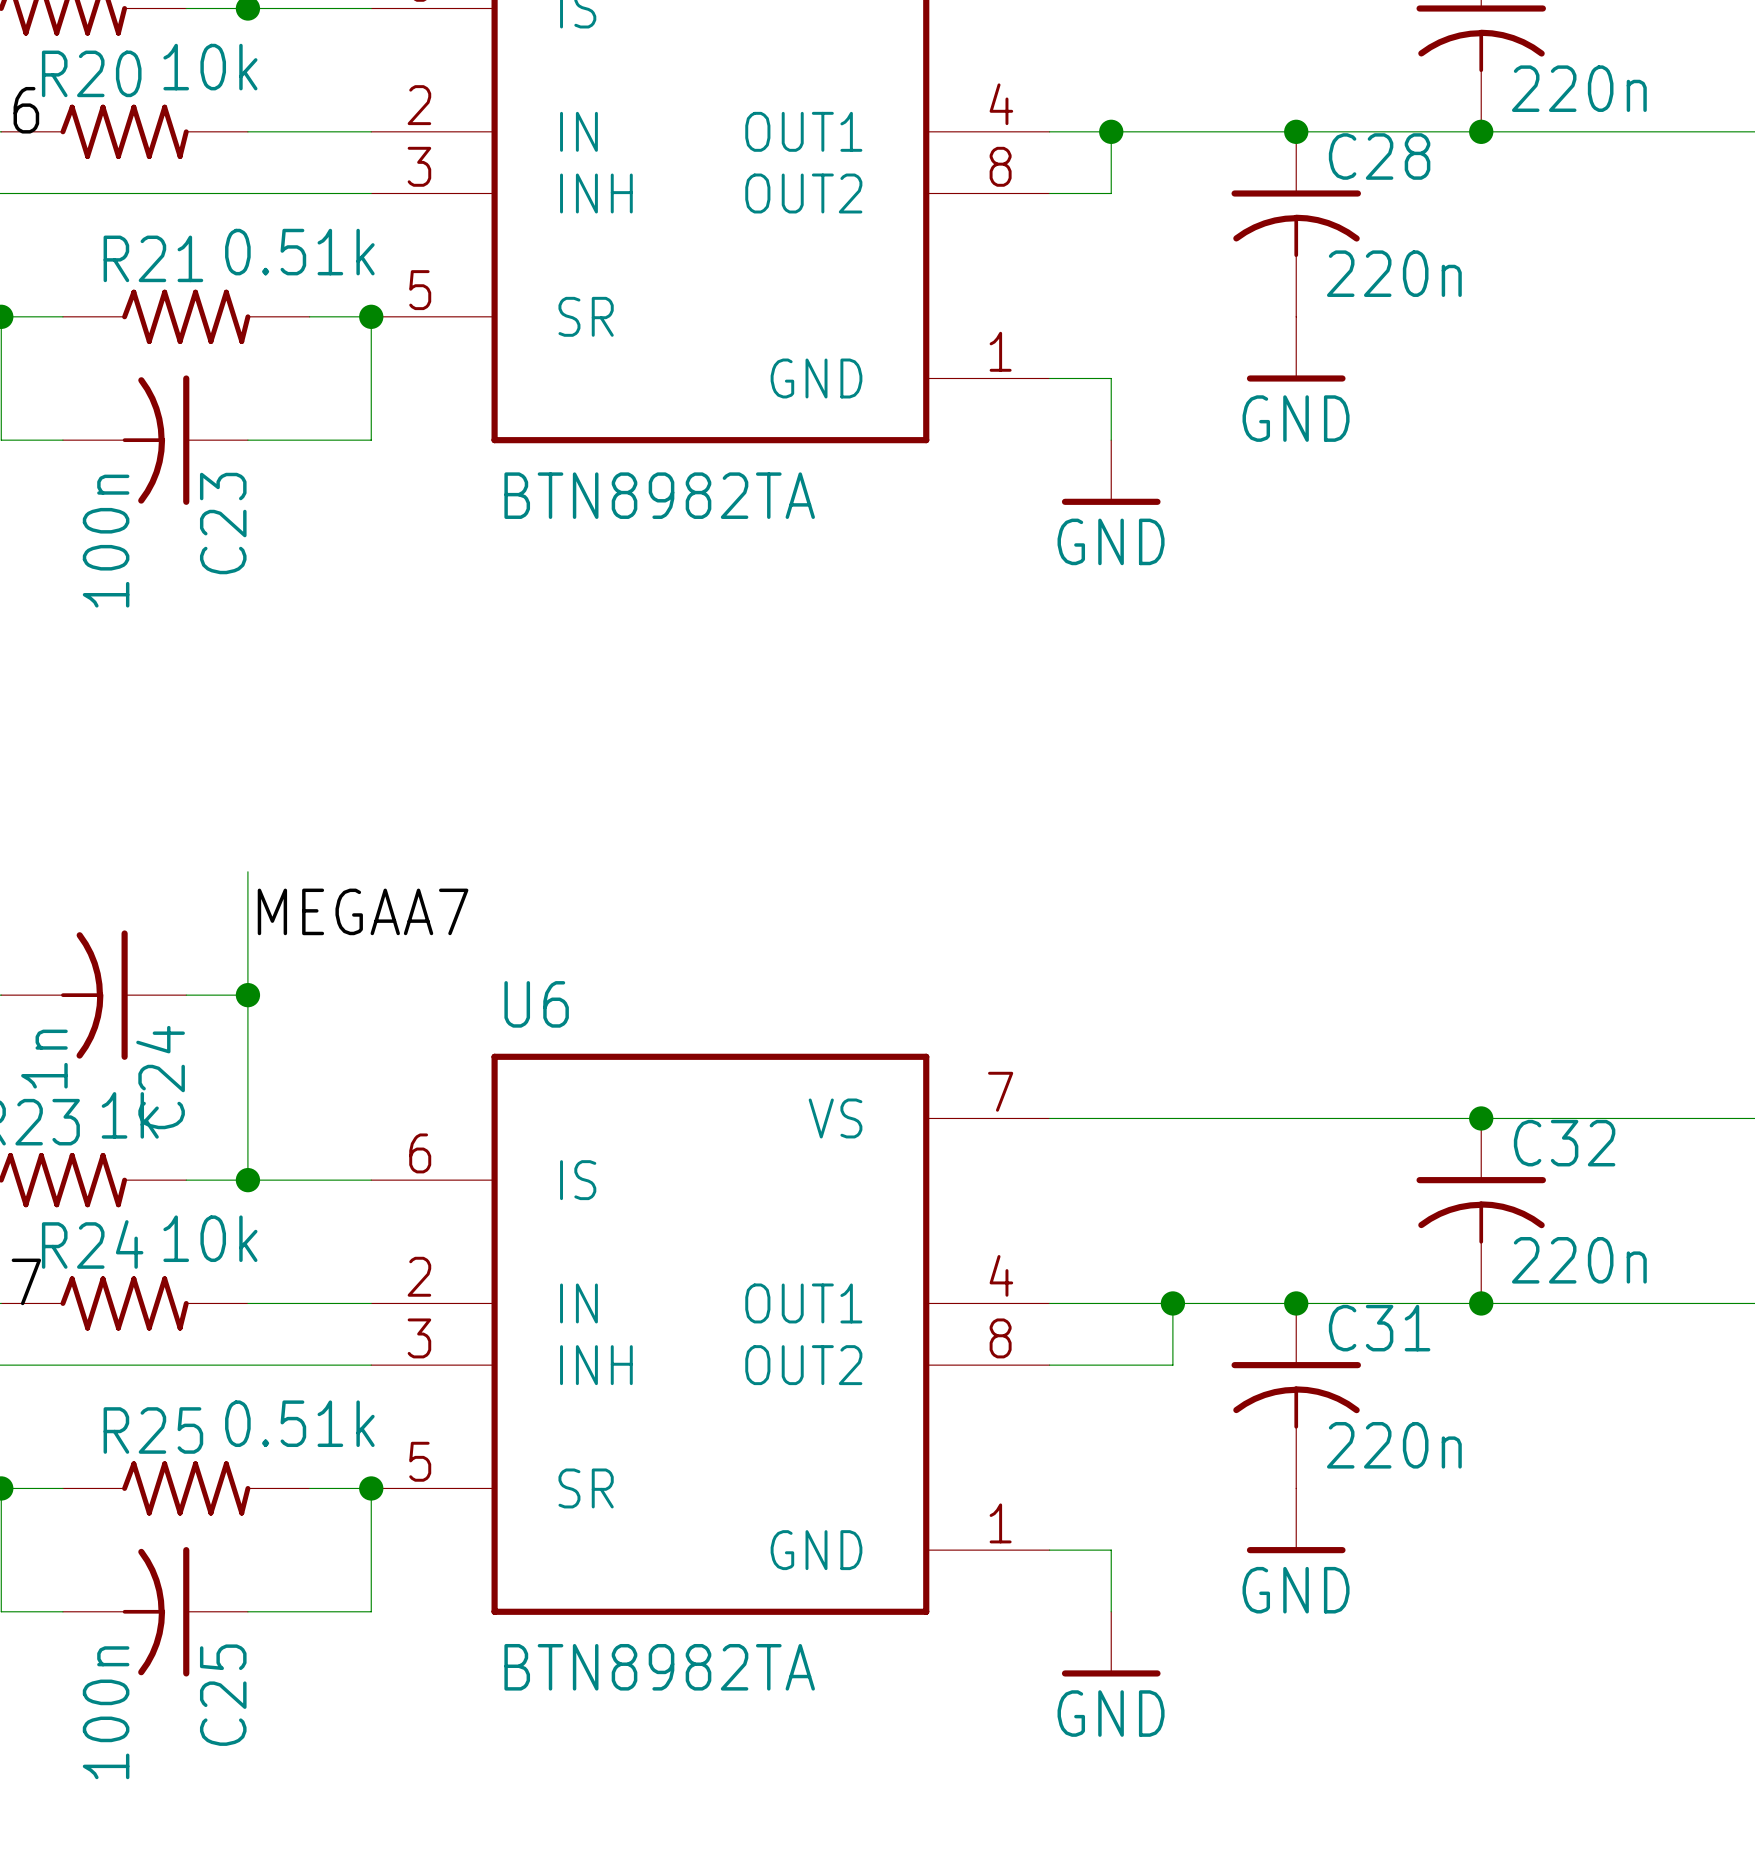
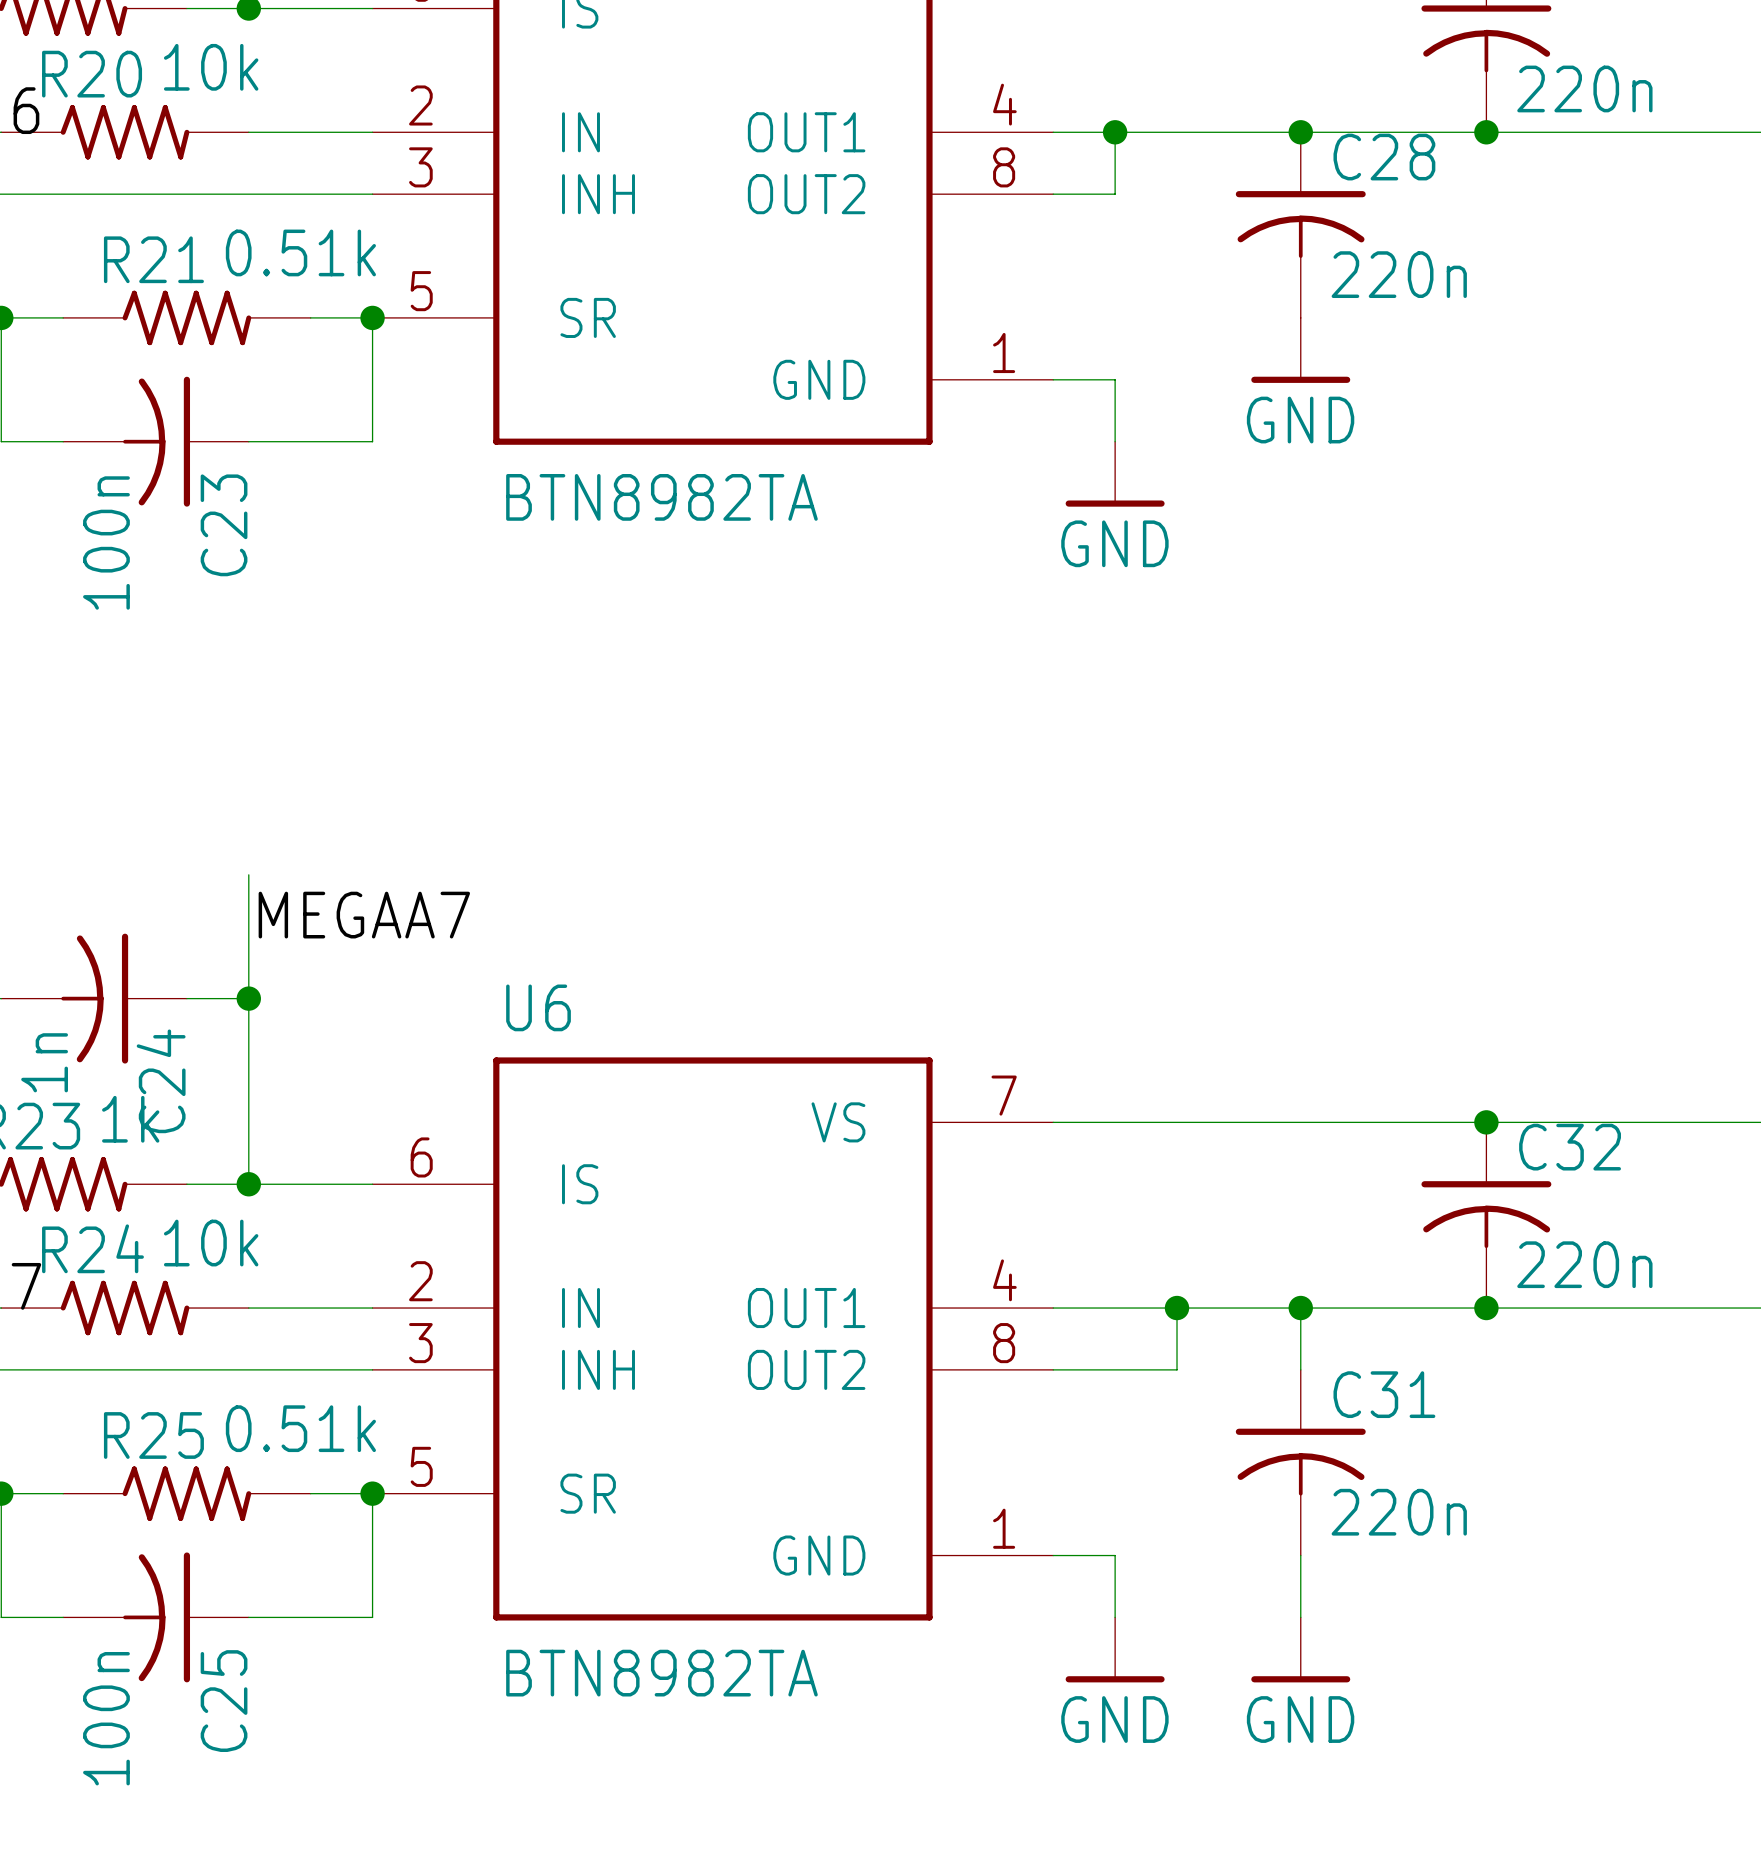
C31 position: (1296, 1395) -> (1300, 1462)
power symbol position: GND (1296, 1520) -> GND (1300, 1649)
wire: none -> (1300, 1555) (1300, 1617)

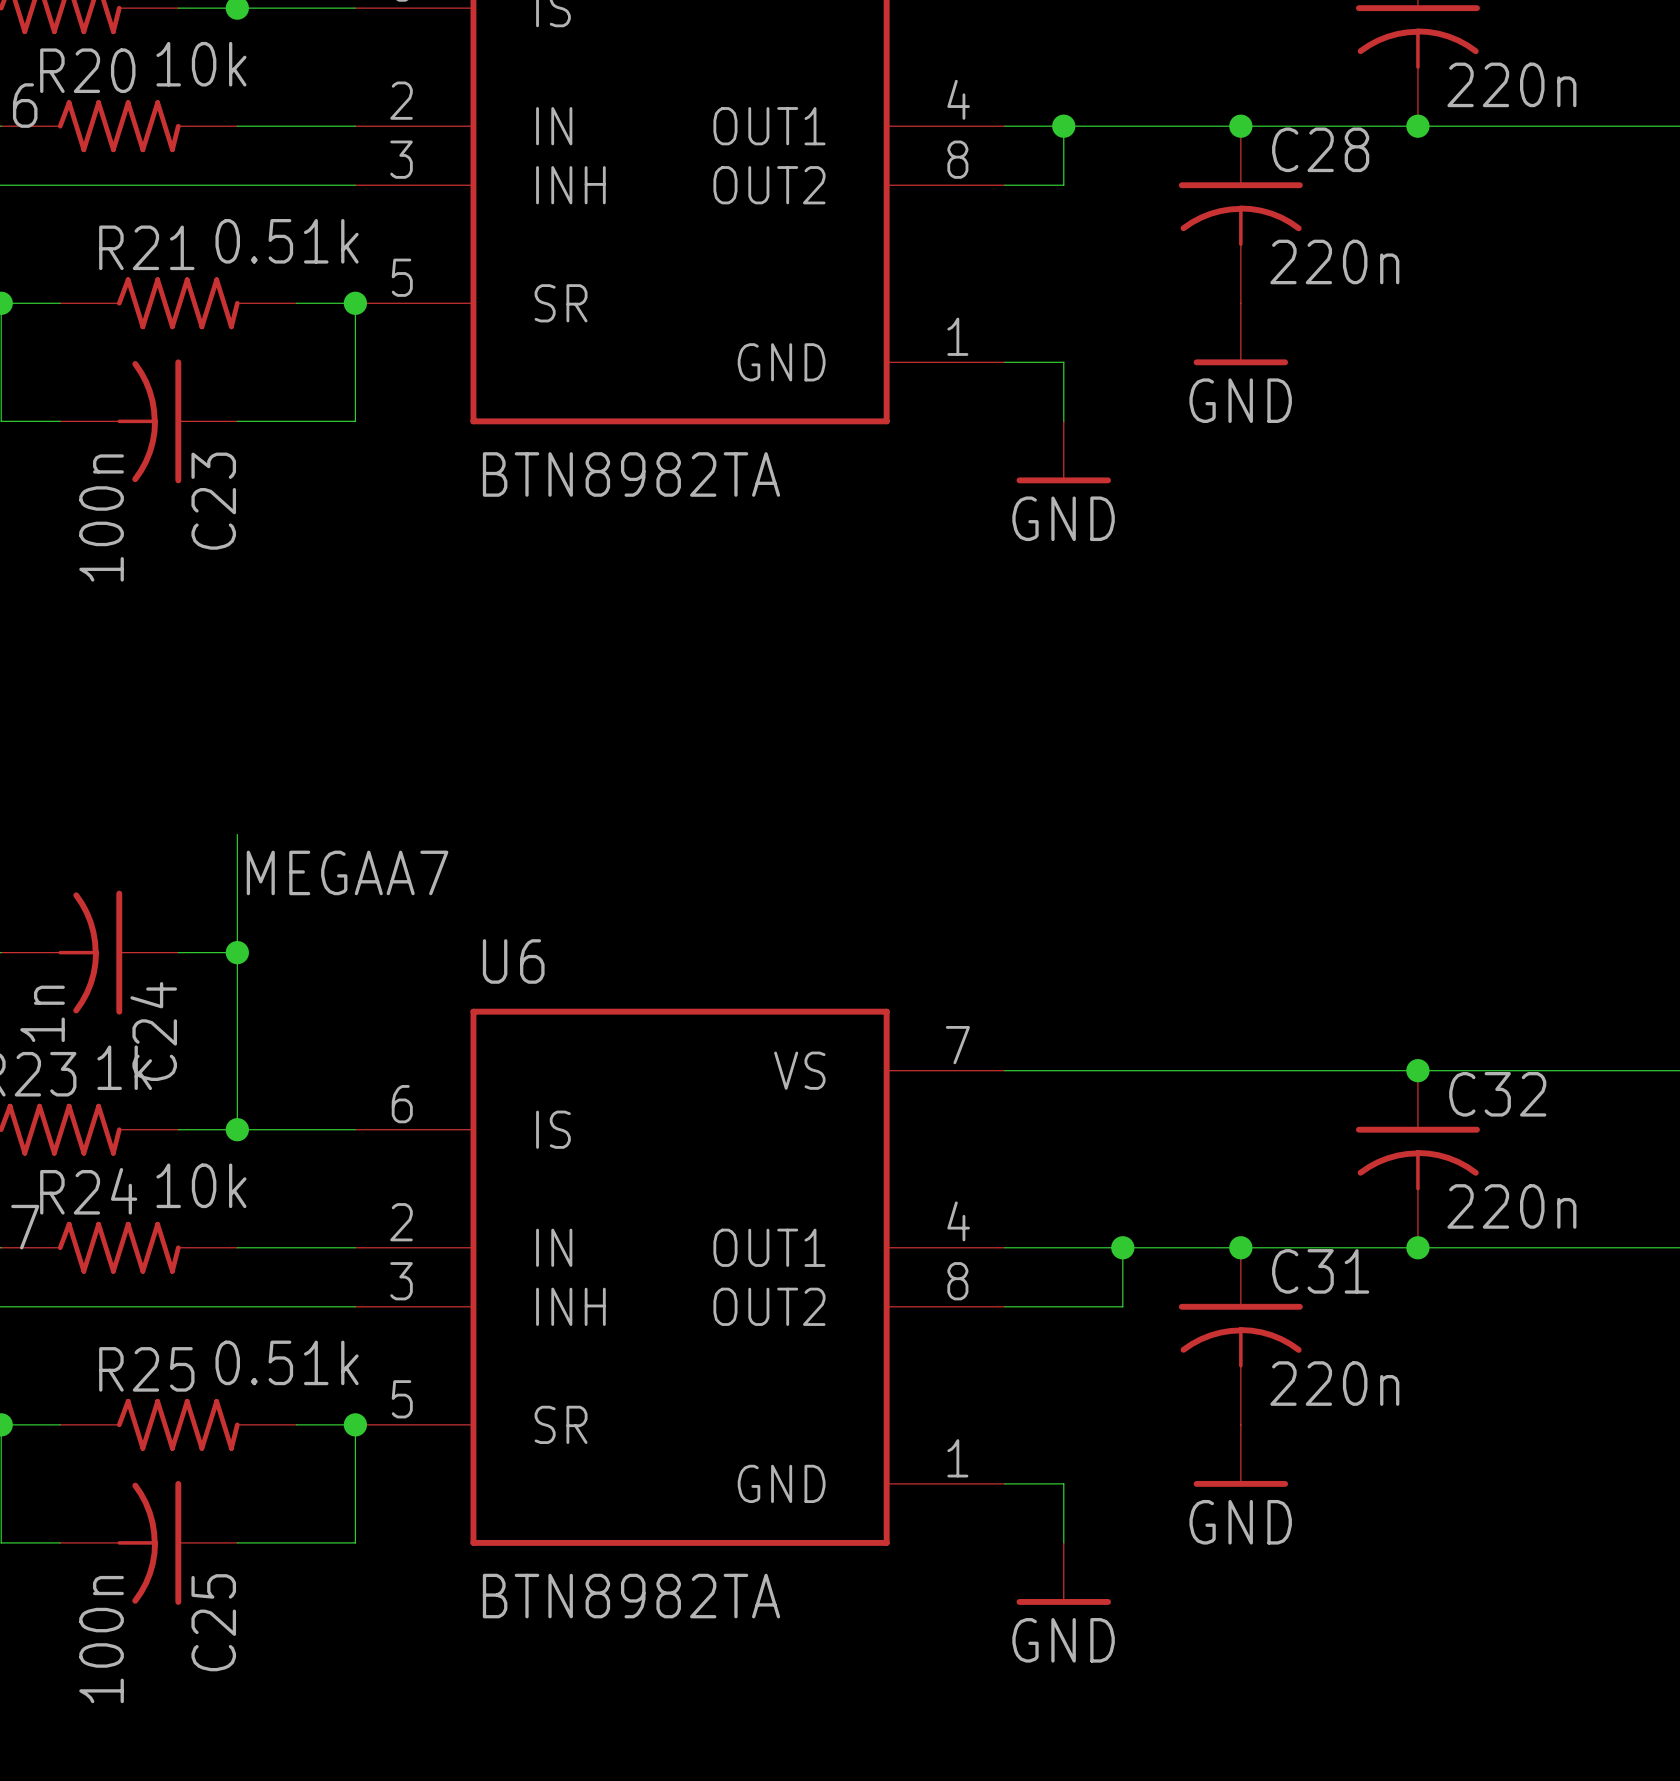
C31 position: (1300, 1462) -> (1240, 1336)
wire: (1300, 1555) (1300, 1617) -> none
power symbol position: GND (1300, 1649) -> GND (1240, 1455)

